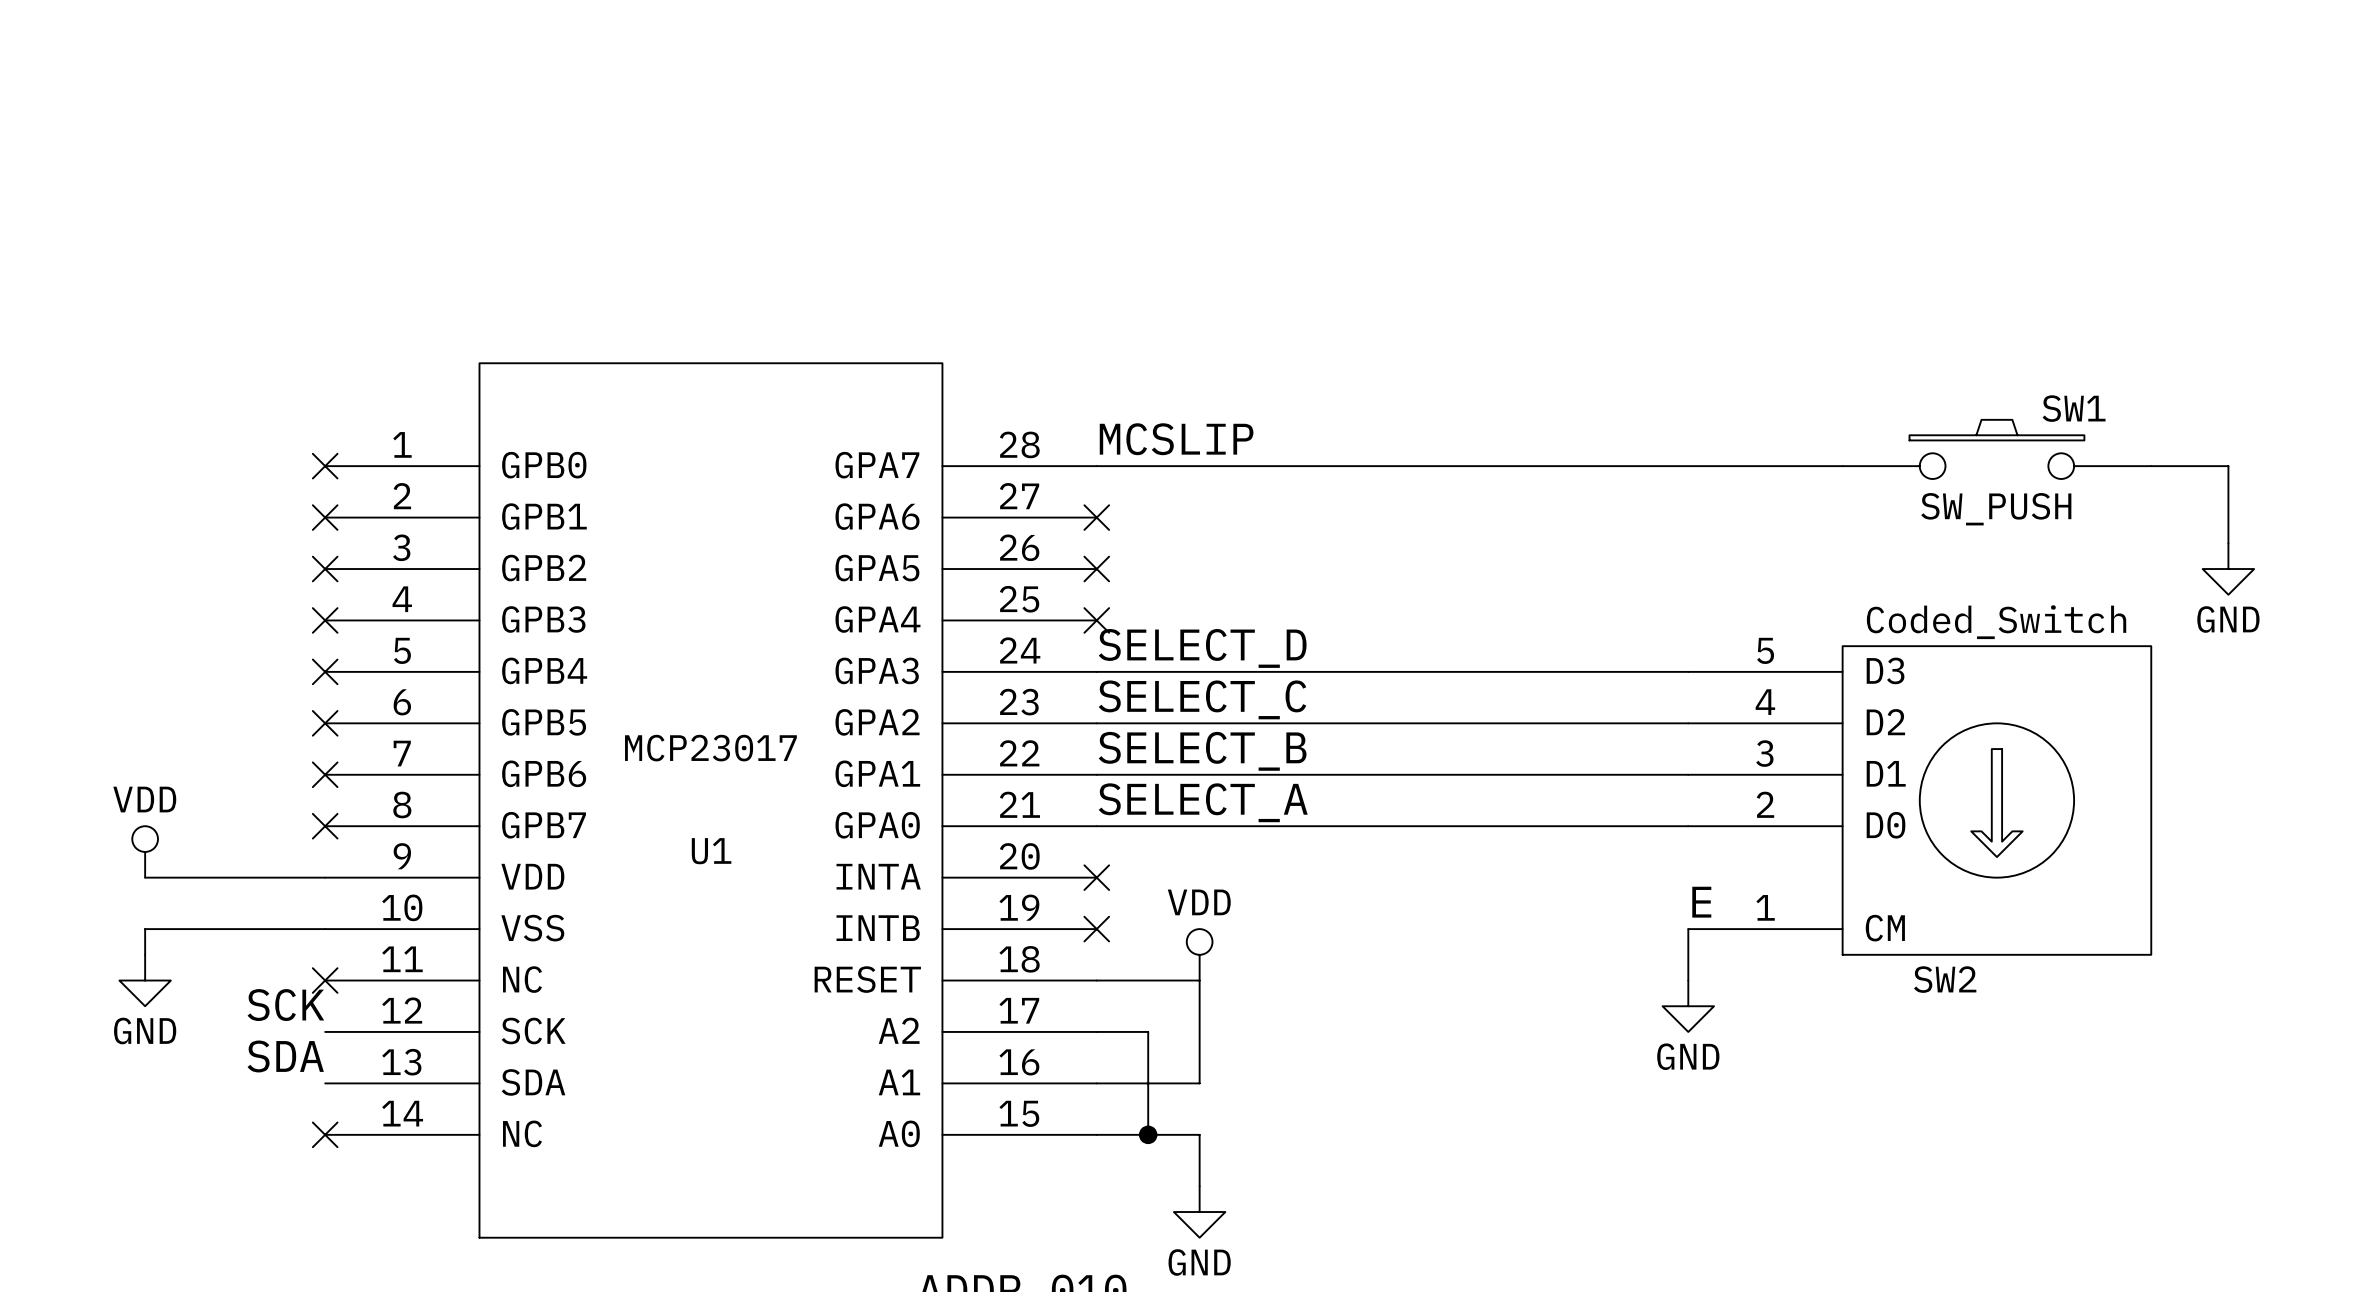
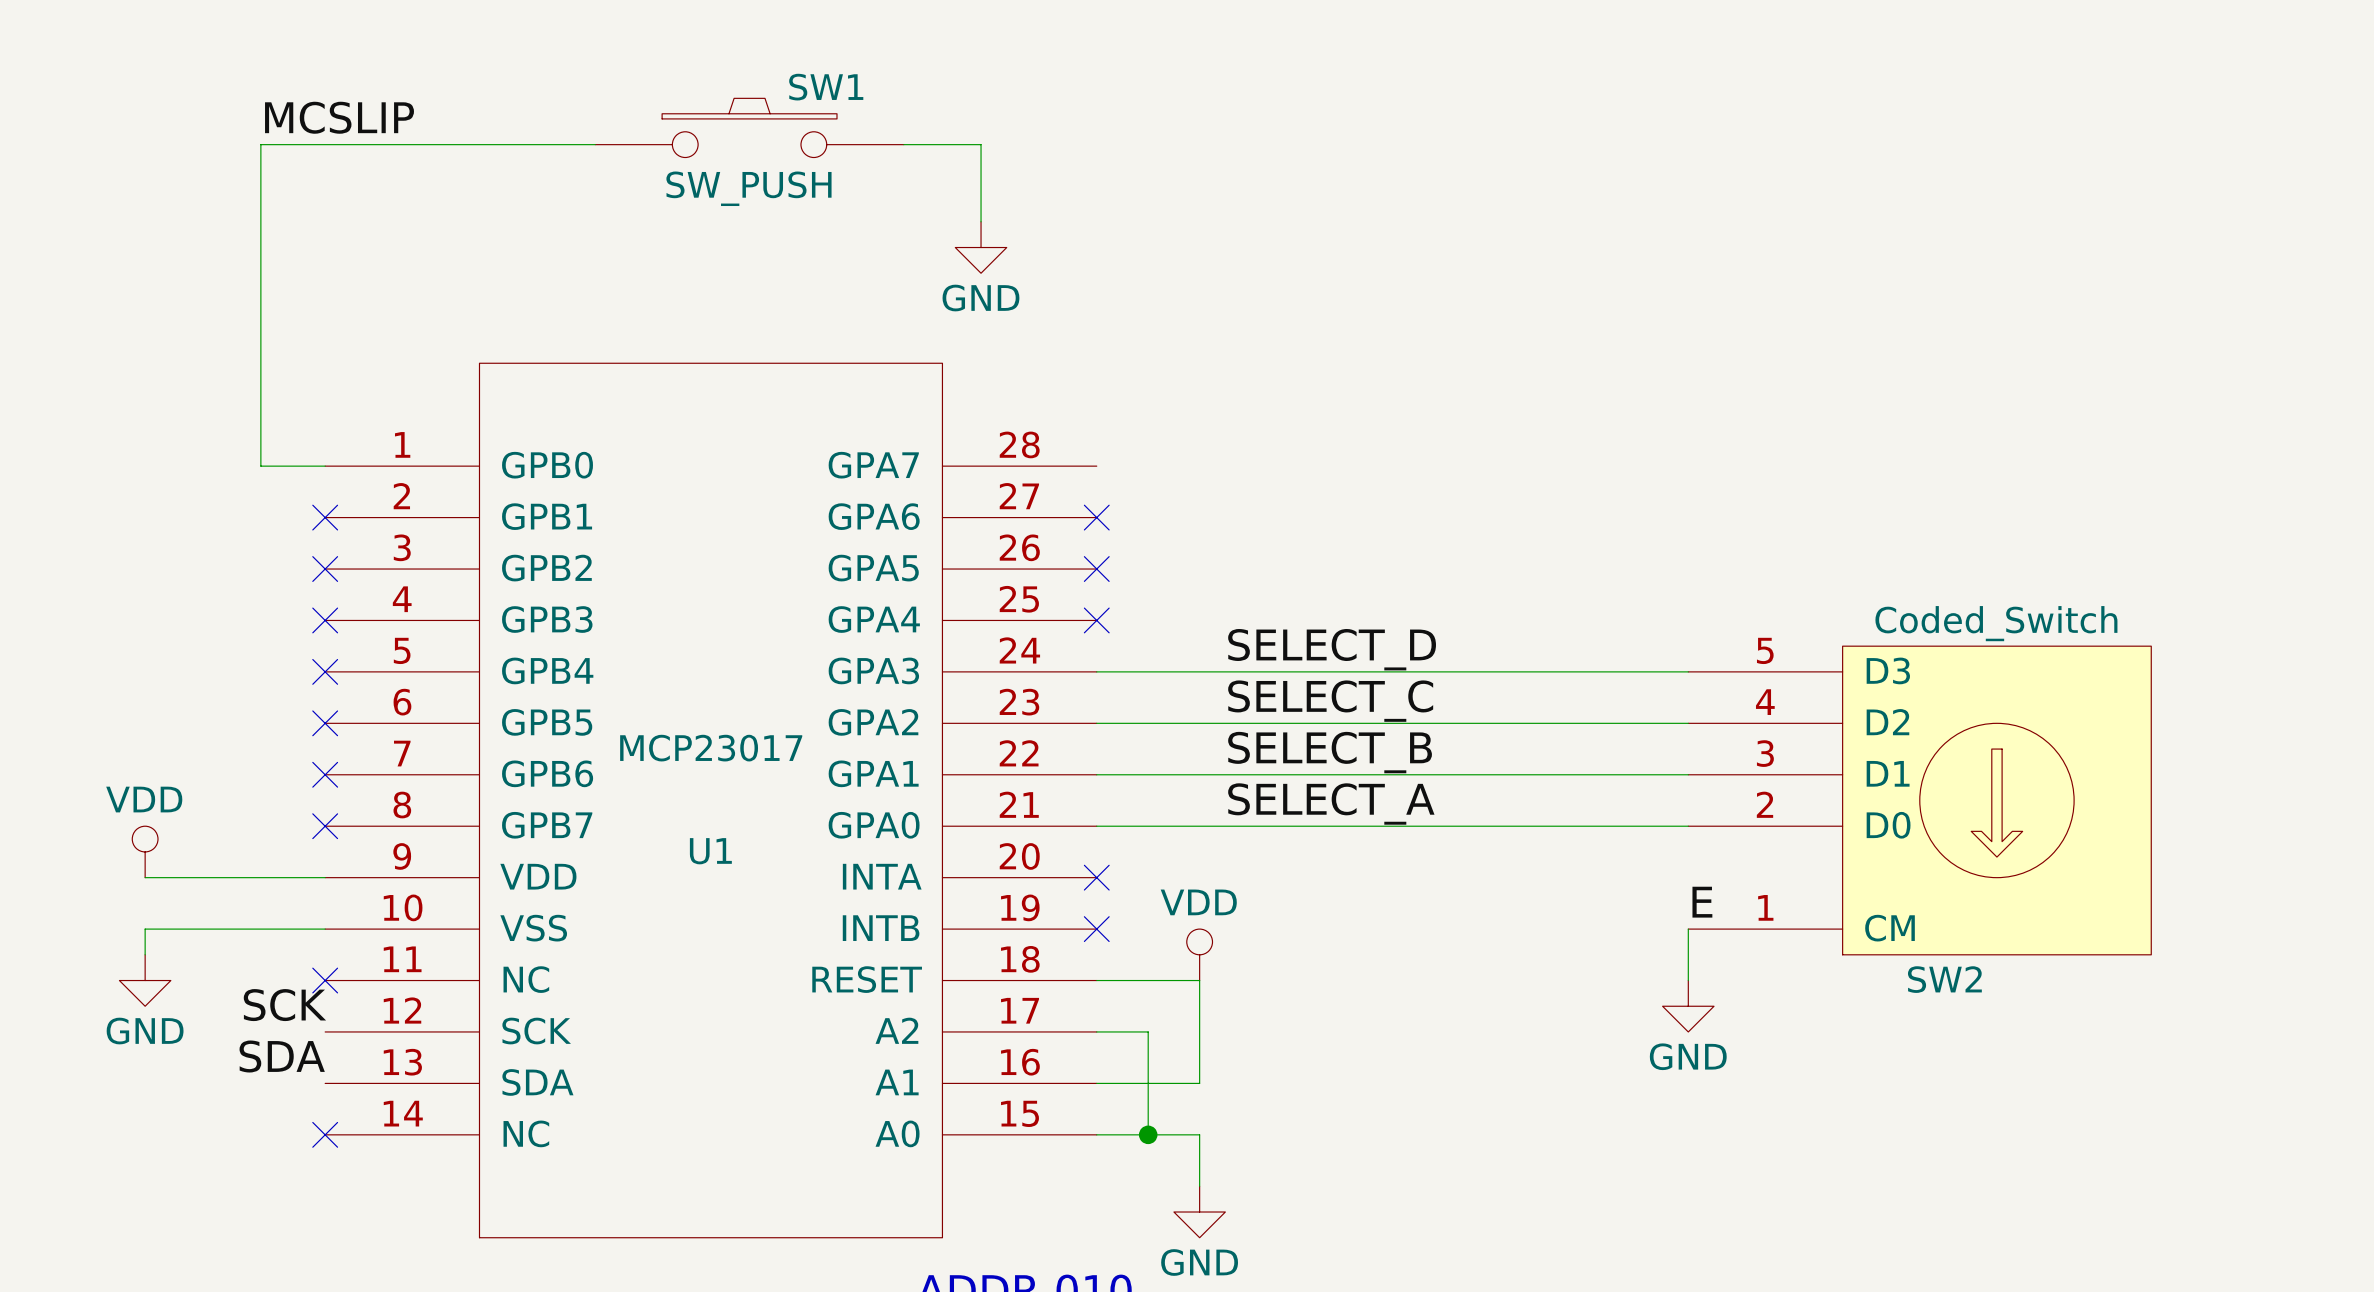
label: none -> MCSLIP (339, 117)
wire: none -> (595, 144) (260, 144) (260, 466) (325, 466)
wire: none -> (903, 144) (981, 144) (981, 221)
power symbol: none -> GND (981, 247)
label: MCSLIP (1176, 439) -> none
SW1 position: (1996, 449) -> (749, 127)
no-connect mark: (325, 466) -> none
wire: (1096, 466) (1842, 466) -> none
wire: (2151, 466) (2228, 466) (2228, 543) -> none
power symbol: GND (2228, 569) -> none
label position: SELECT_D (1202, 648) -> SELECT_D (1332, 649)
label position: SELECT_C (1202, 699) -> SELECT_C (1330, 701)
label position: SELECT_B (1202, 751) -> SELECT_B (1330, 752)
label position: SELECT_A (1203, 802) -> SELECT_A (1331, 804)

